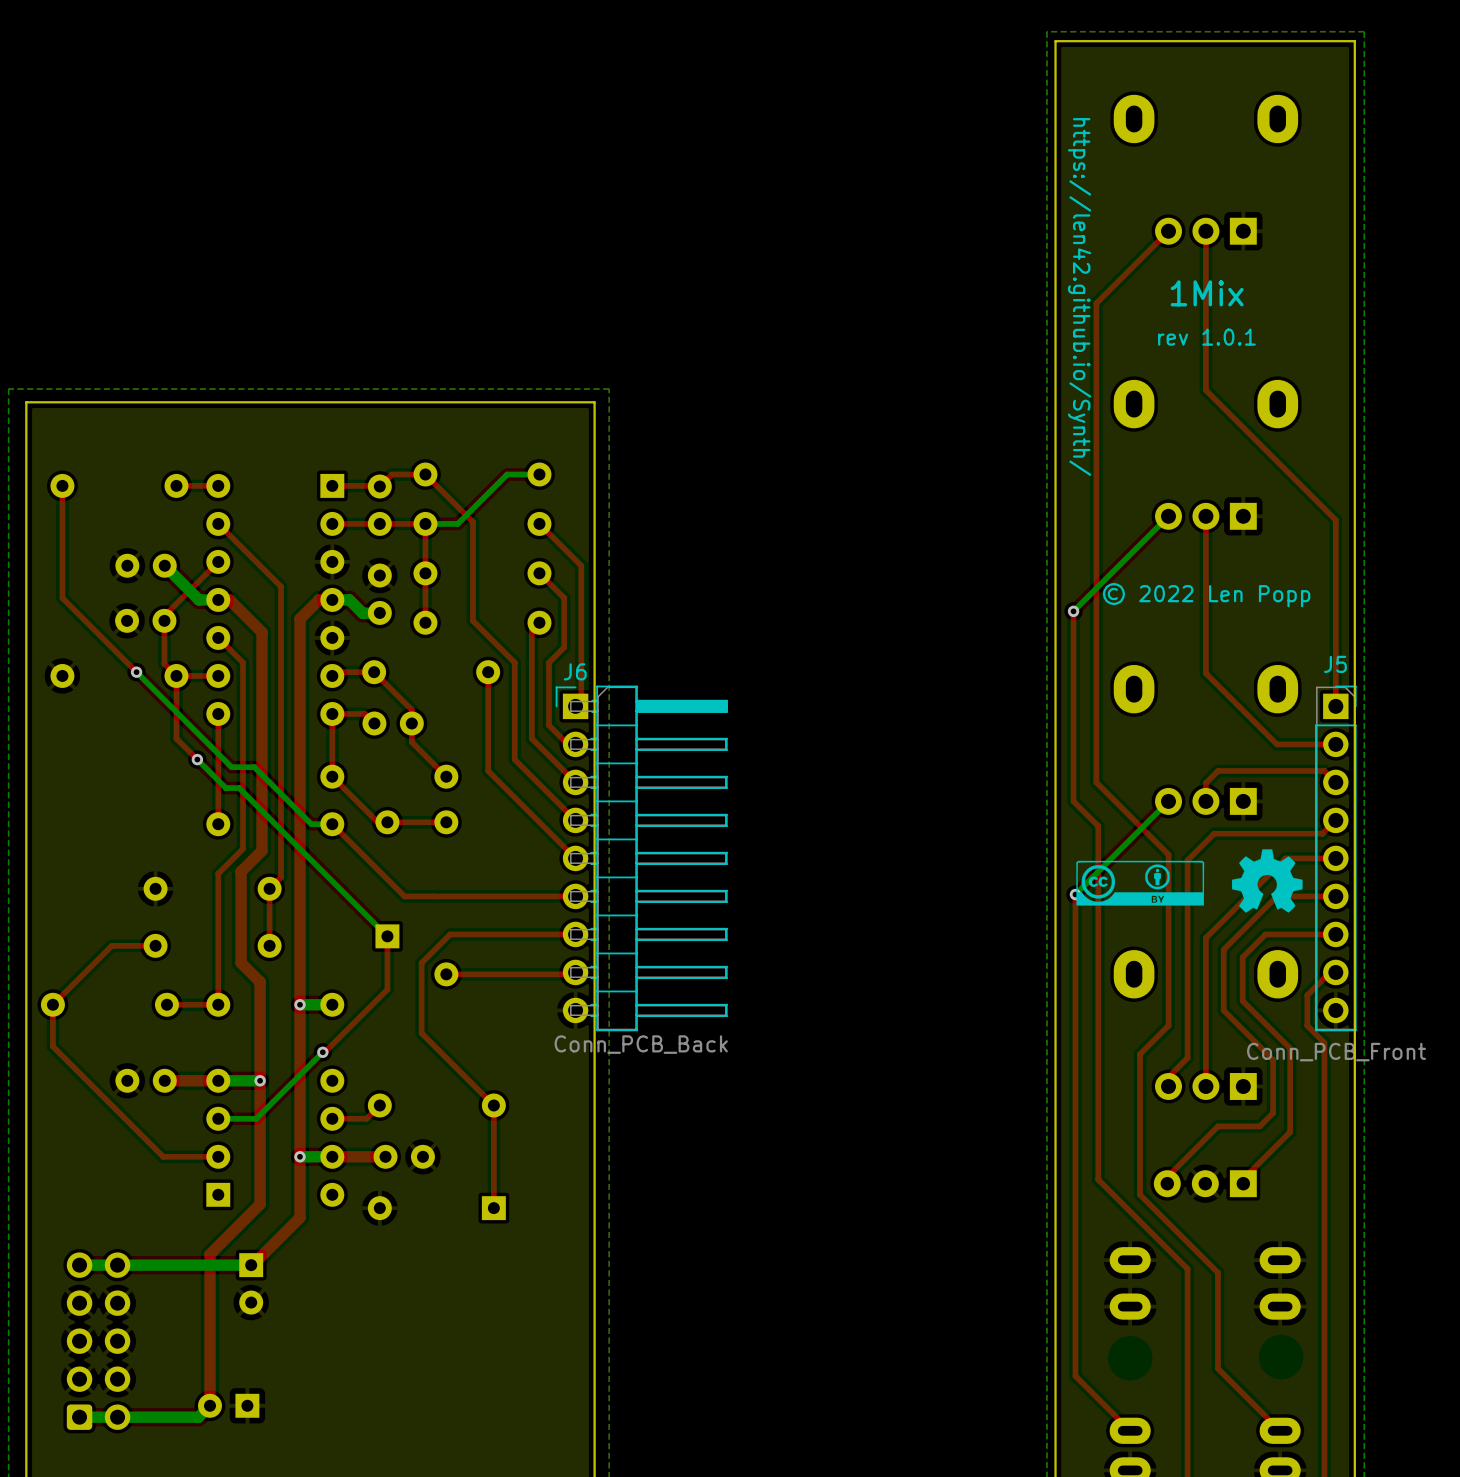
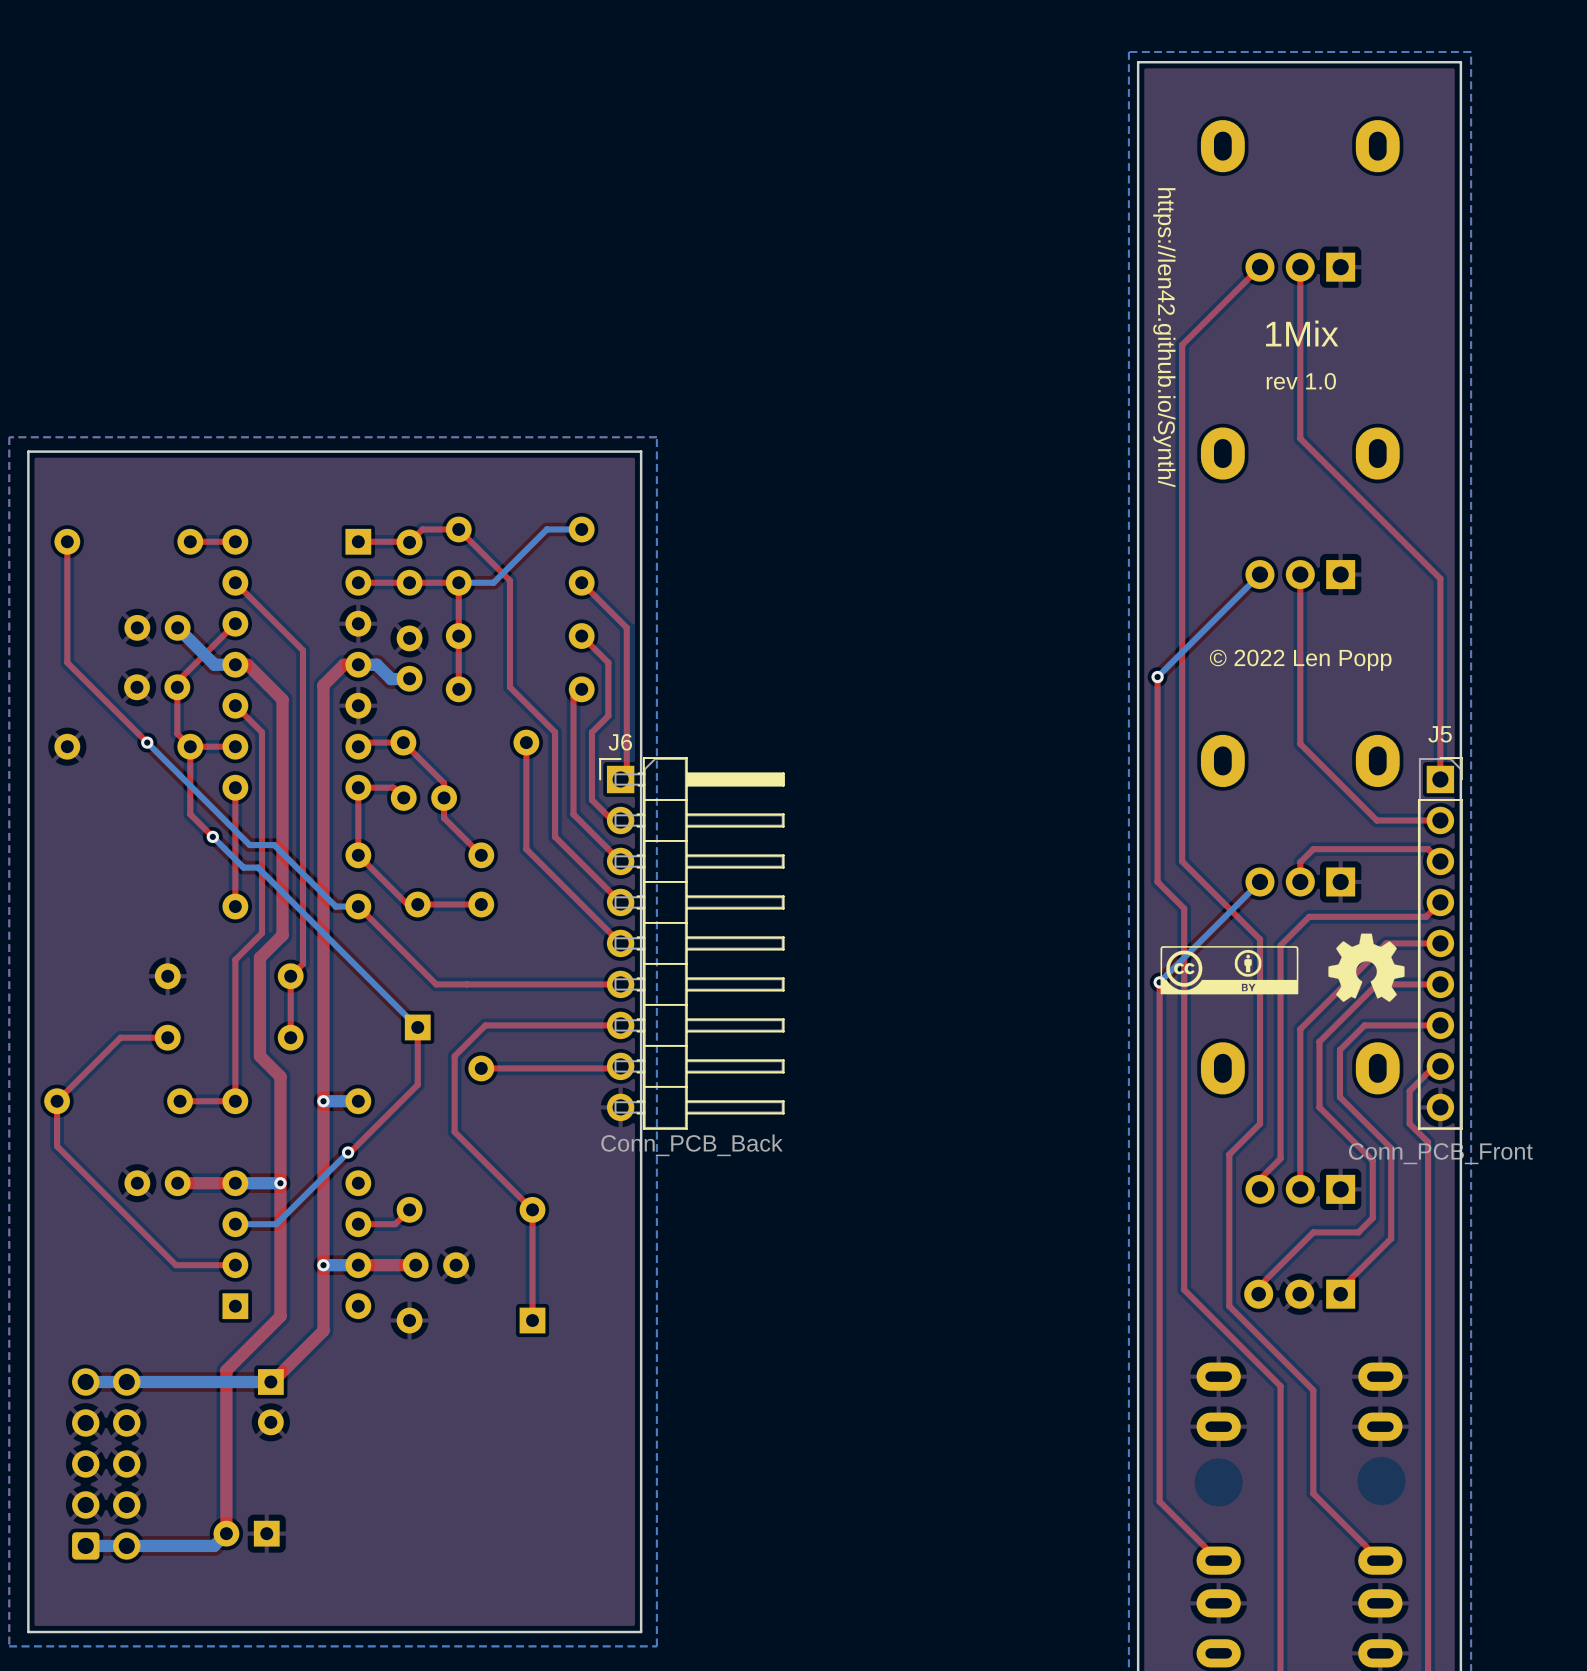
text: rev 1.0.1 (1206, 337) -> rev 1.0 (1301, 381)

